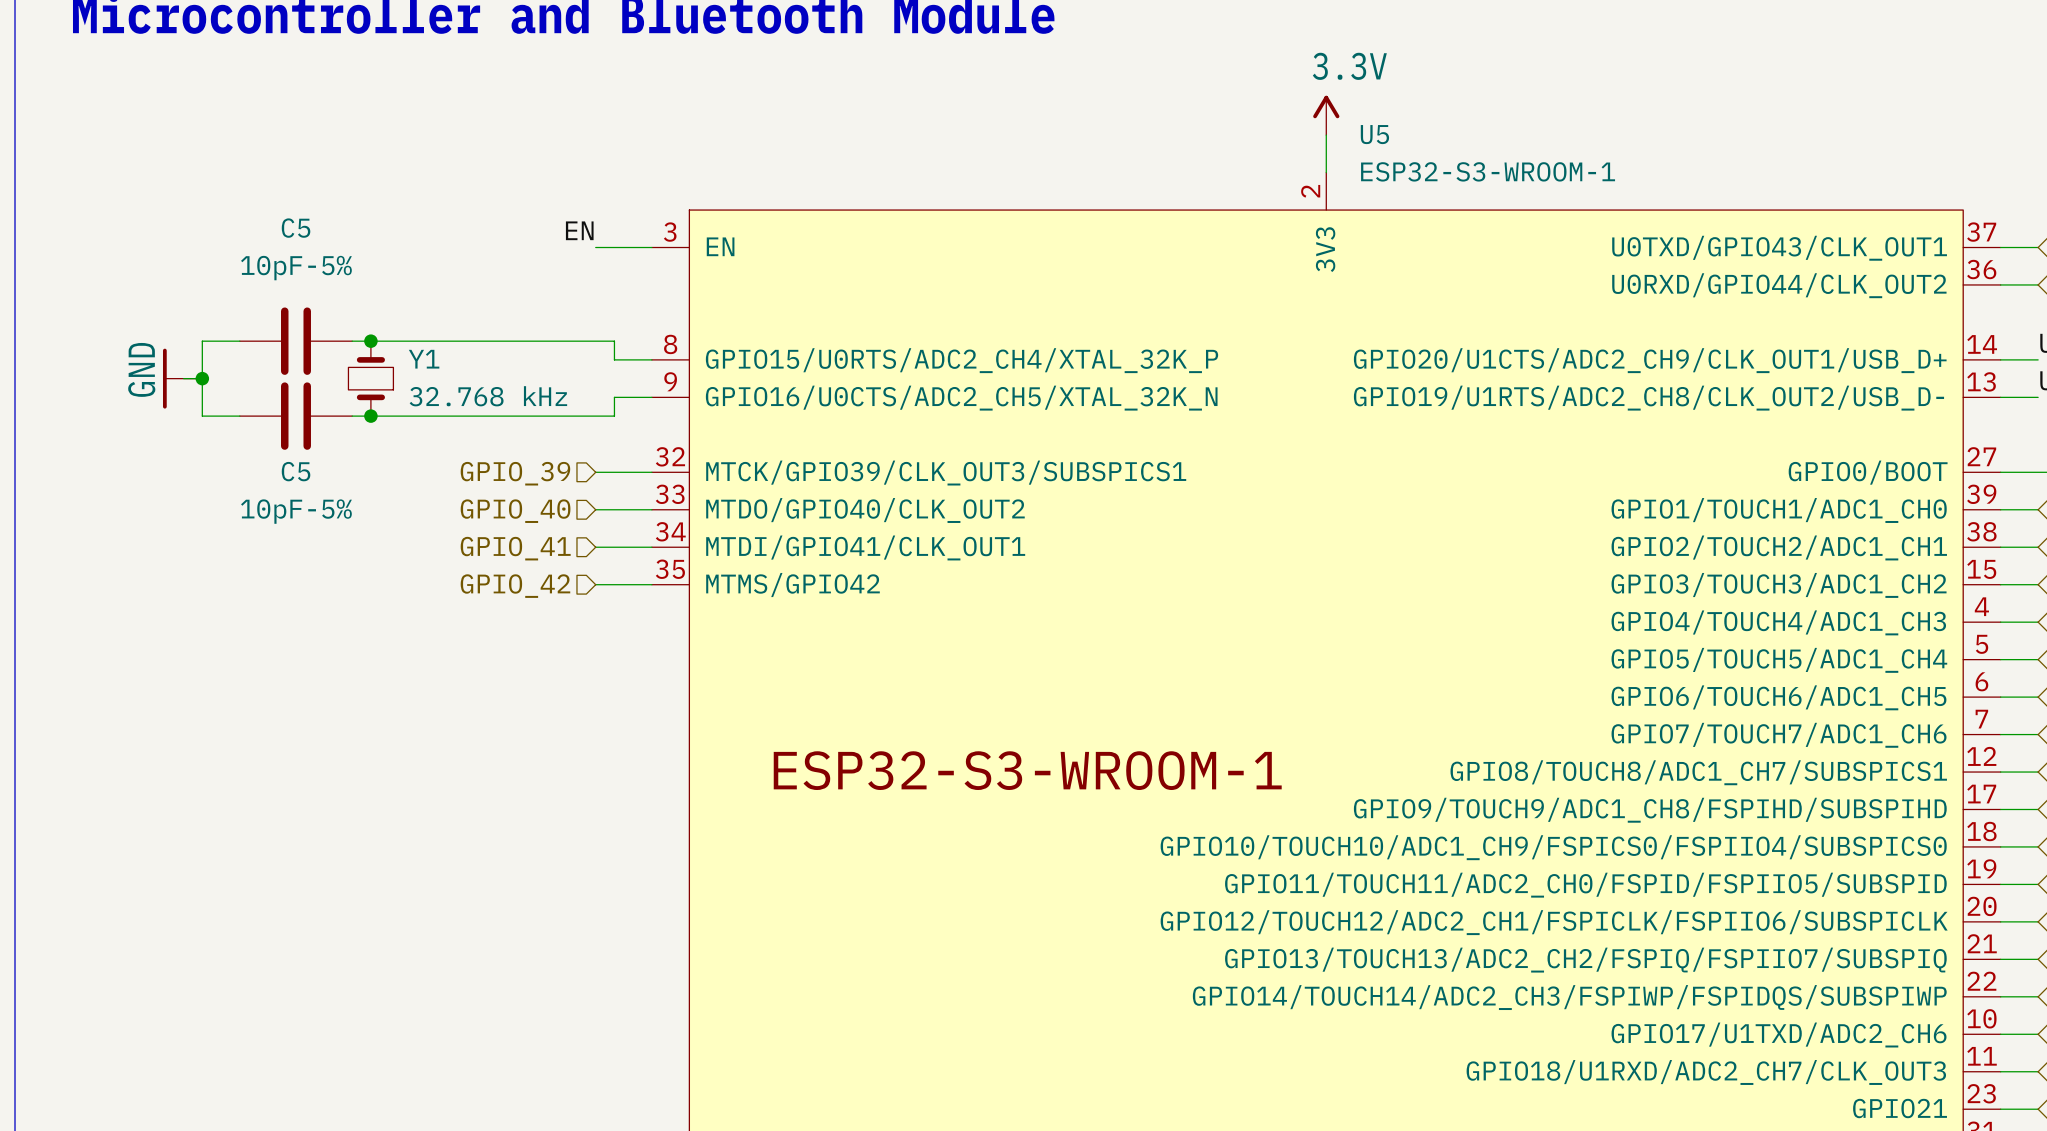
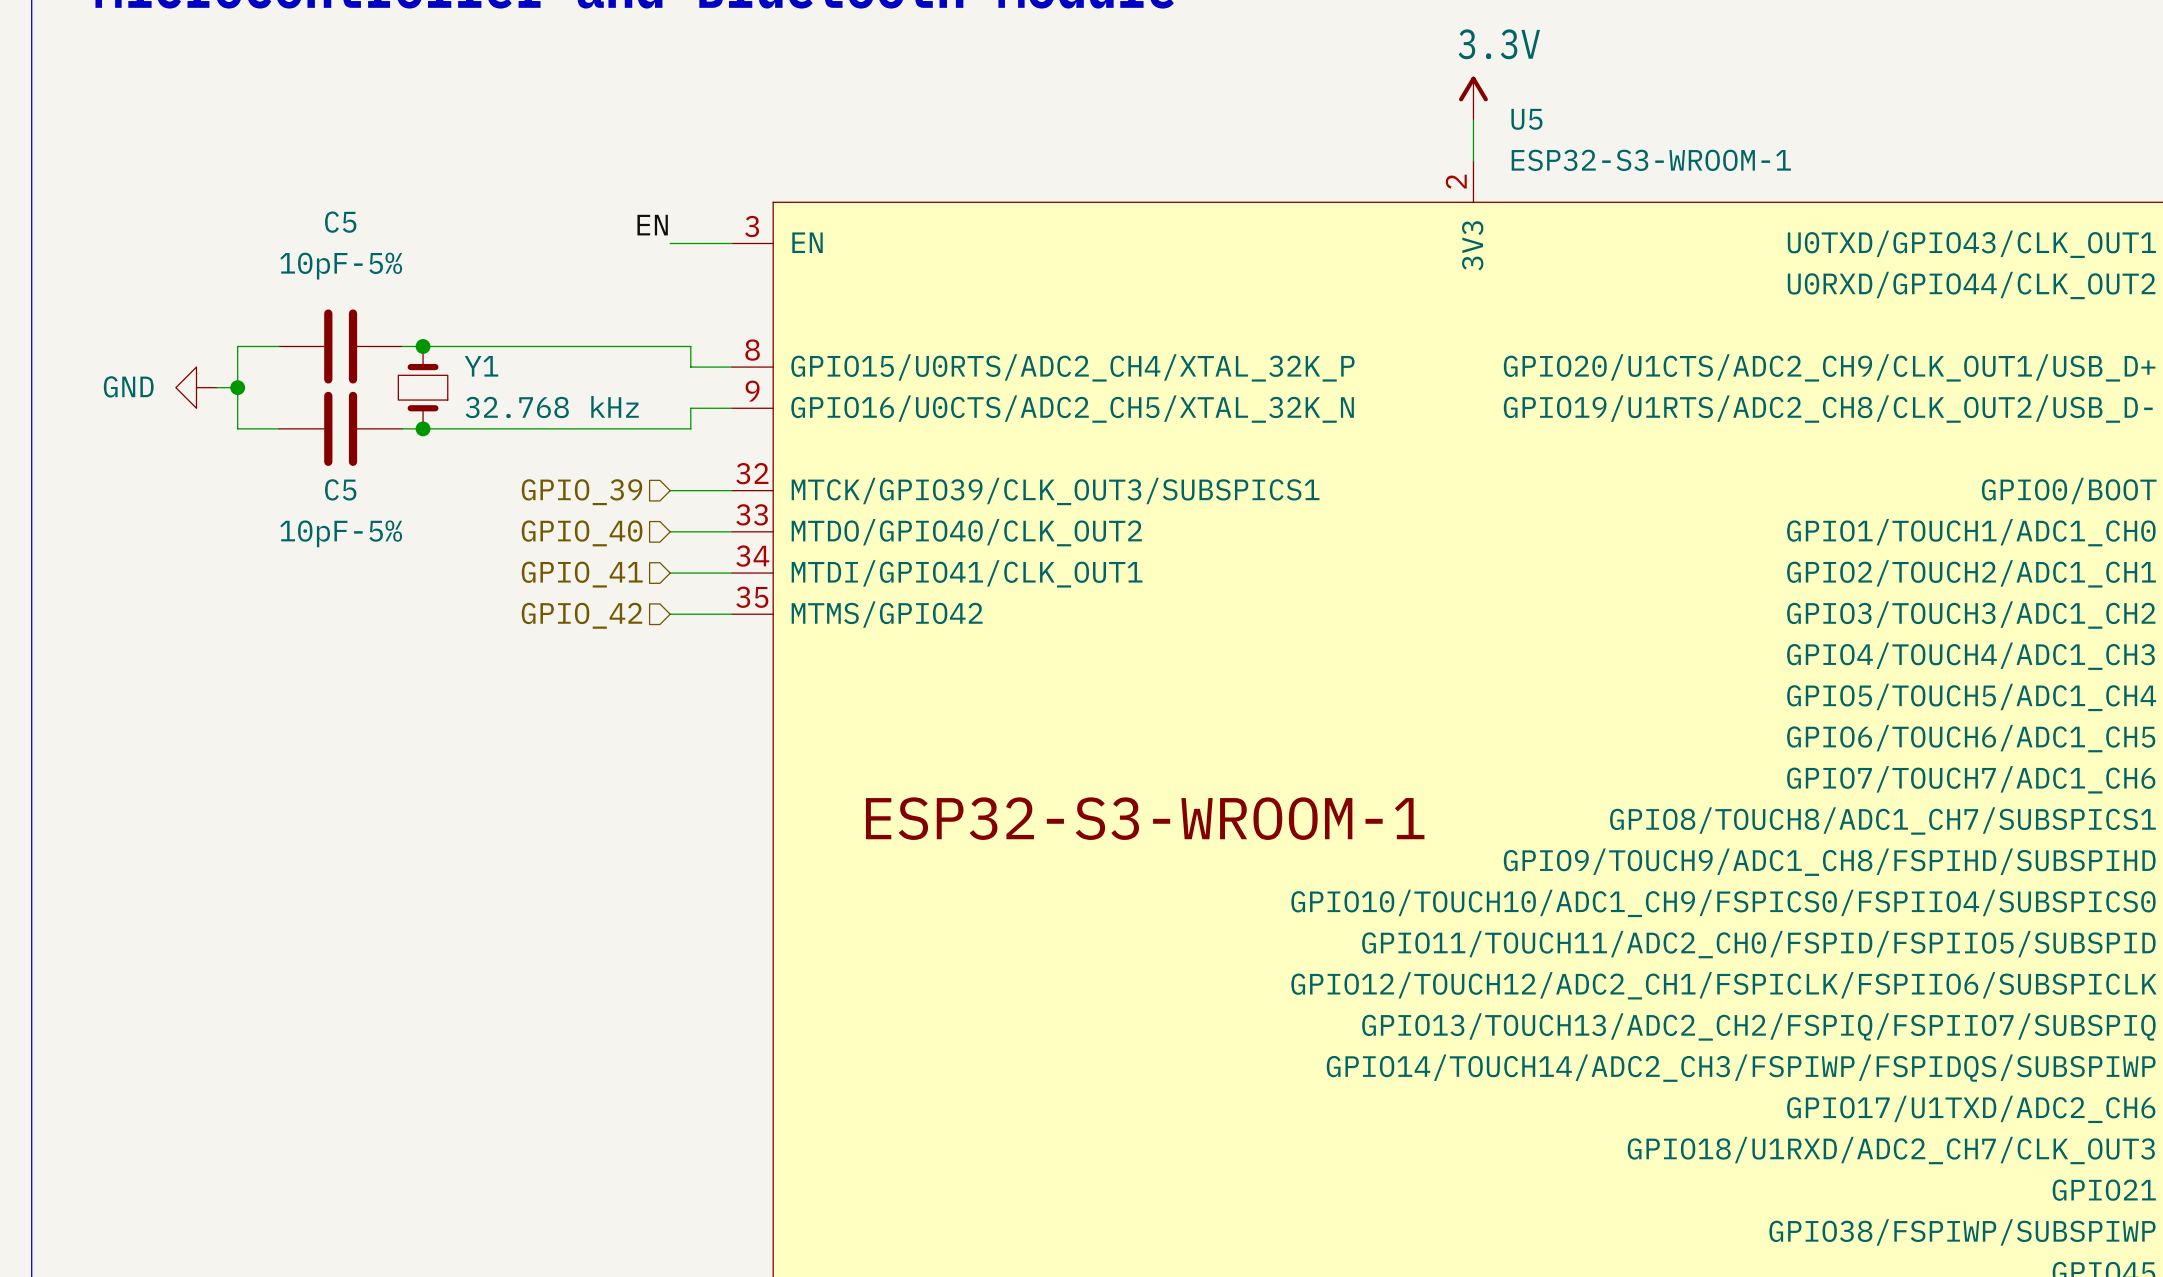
power symbol: none -> GND (196, 387)
power symbol: GND (182, 378) -> none

